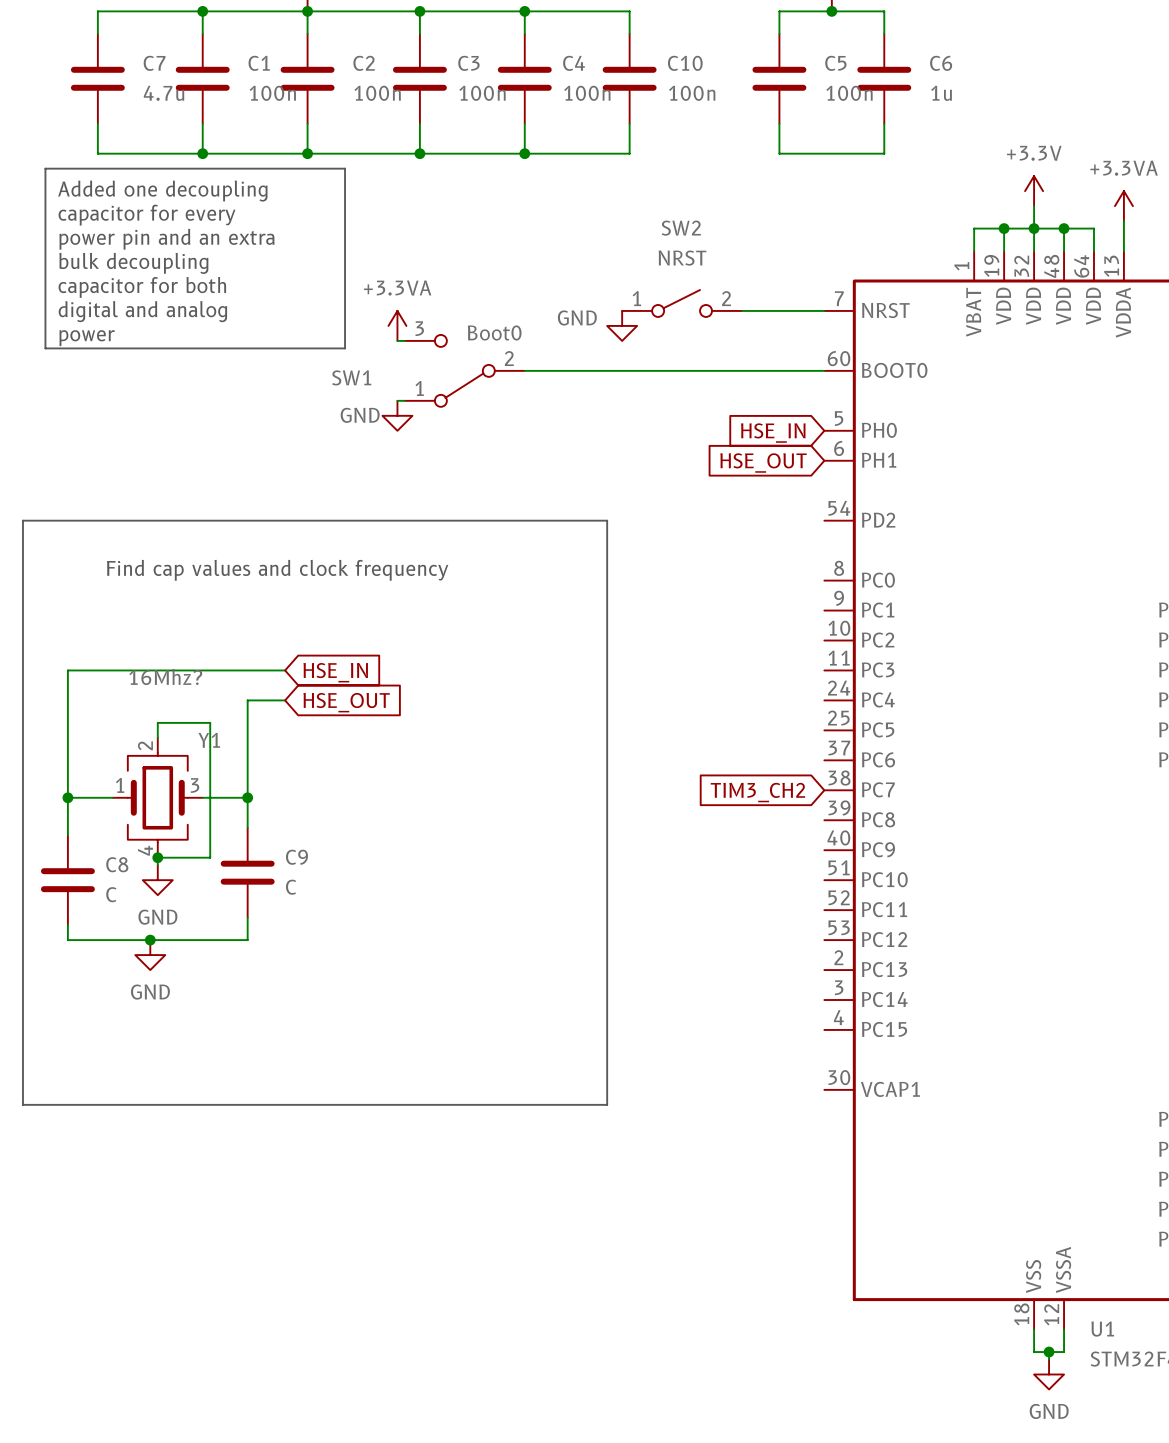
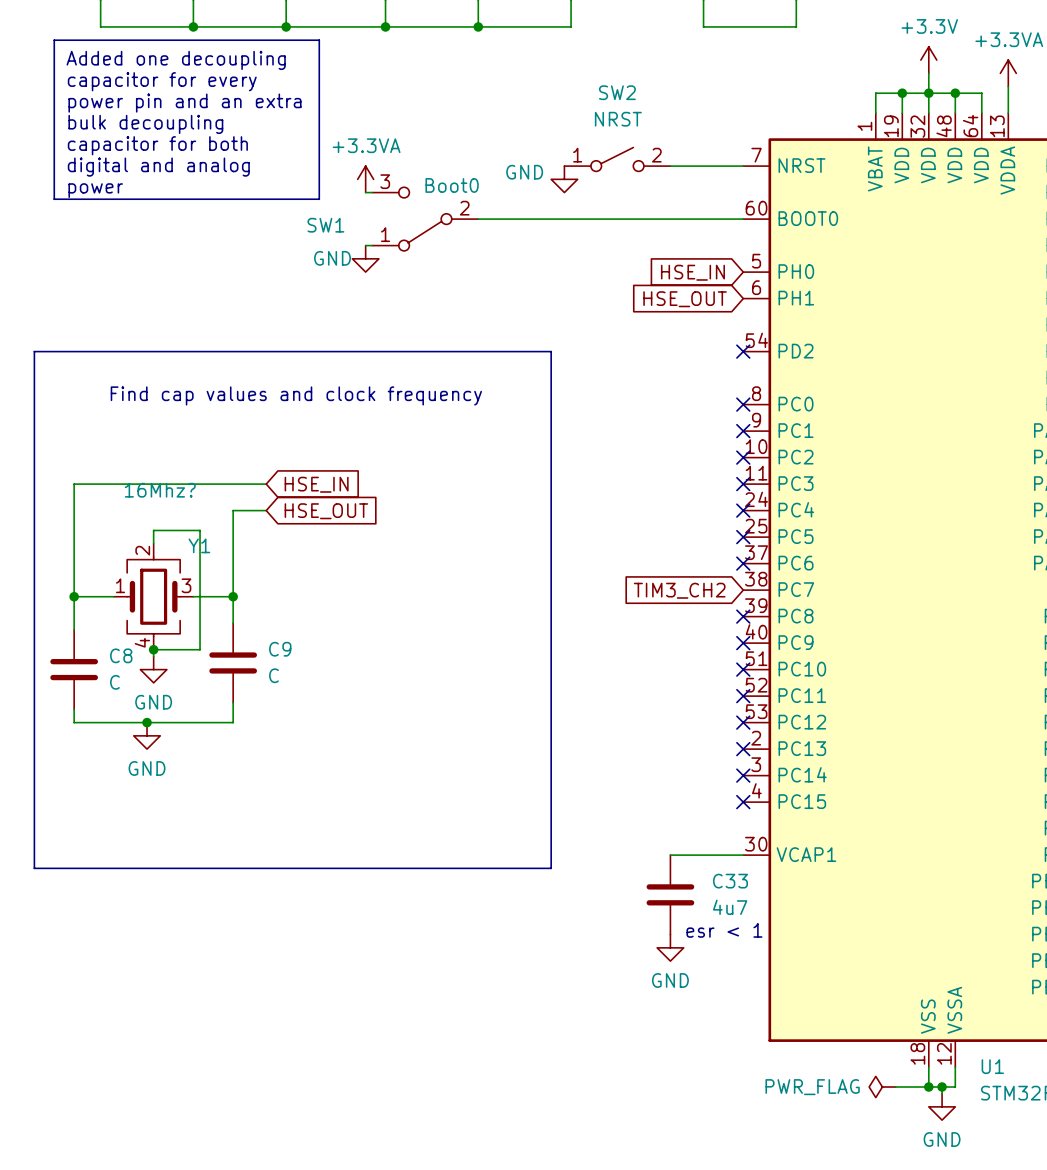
no-connect mark: none -> (743, 351)
no-connect mark: none -> (743, 404)
no-connect mark: none -> (743, 431)
no-connect mark: none -> (743, 457)
no-connect mark: none -> (743, 484)
no-connect mark: none -> (743, 510)
no-connect mark: none -> (743, 537)
no-connect mark: none -> (743, 563)
no-connect mark: none -> (743, 616)
no-connect mark: none -> (743, 643)
no-connect mark: none -> (743, 669)
no-connect mark: none -> (743, 696)
no-connect mark: none -> (743, 722)
no-connect mark: none -> (743, 749)
no-connect mark: none -> (743, 775)
no-connect mark: none -> (743, 802)
wire: none -> (670, 855) (743, 855)
C33: none -> 4u7 (670, 894)
text: none -> esr < 1 (724, 930)
power symbol: none -> GND (670, 947)
power symbol: none -> PWR_FLAG (882, 1087)
wire: none -> (895, 1087) (928, 1087)
junction: none -> (928, 1087)

